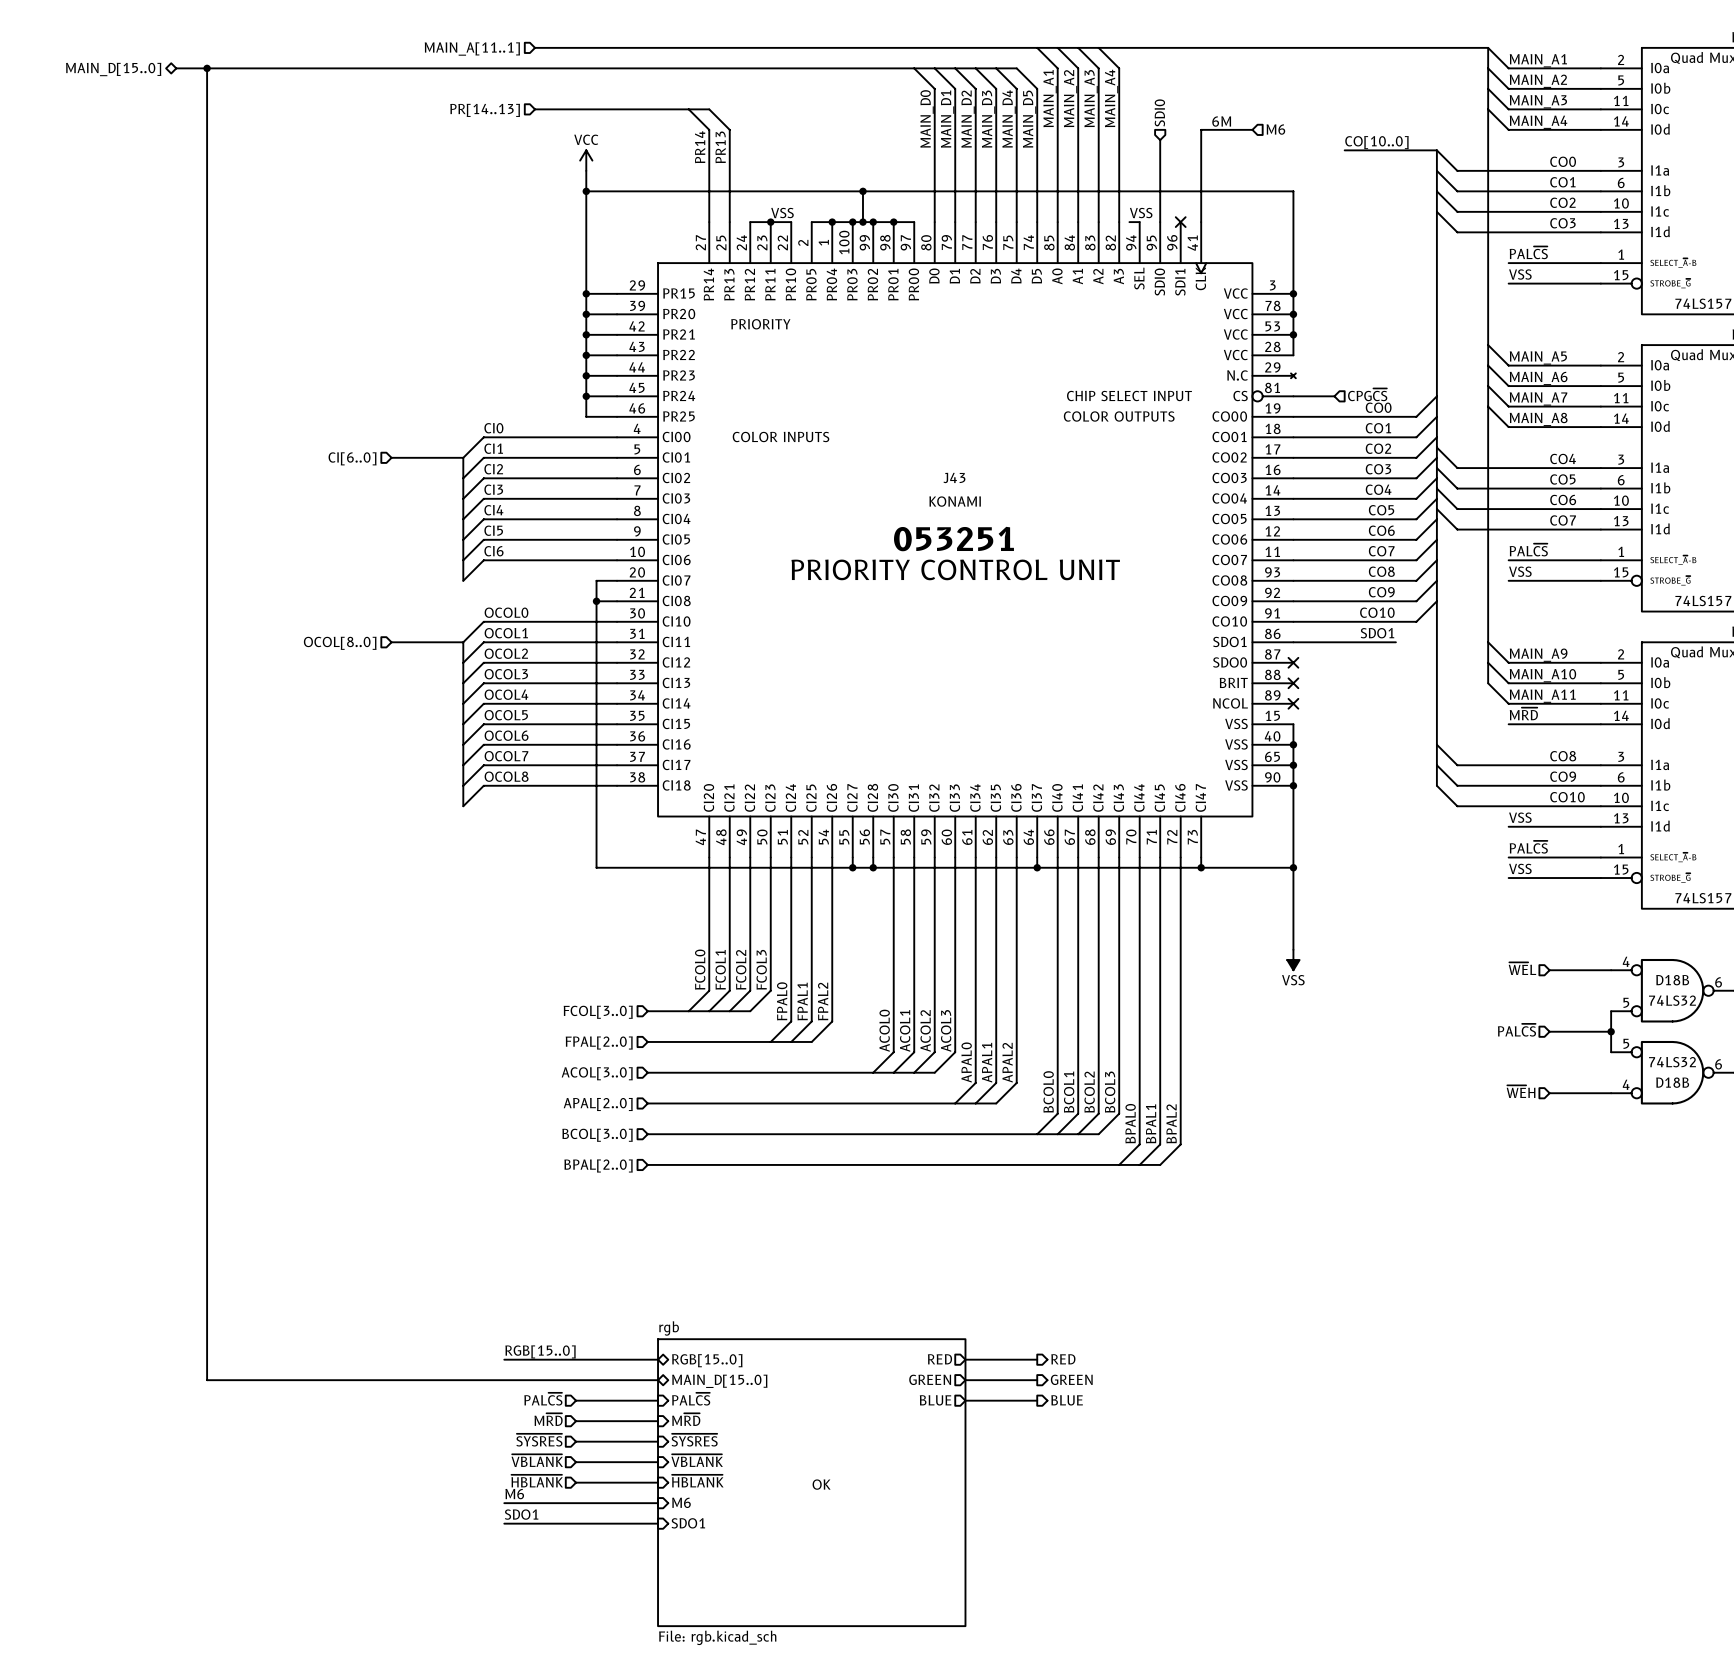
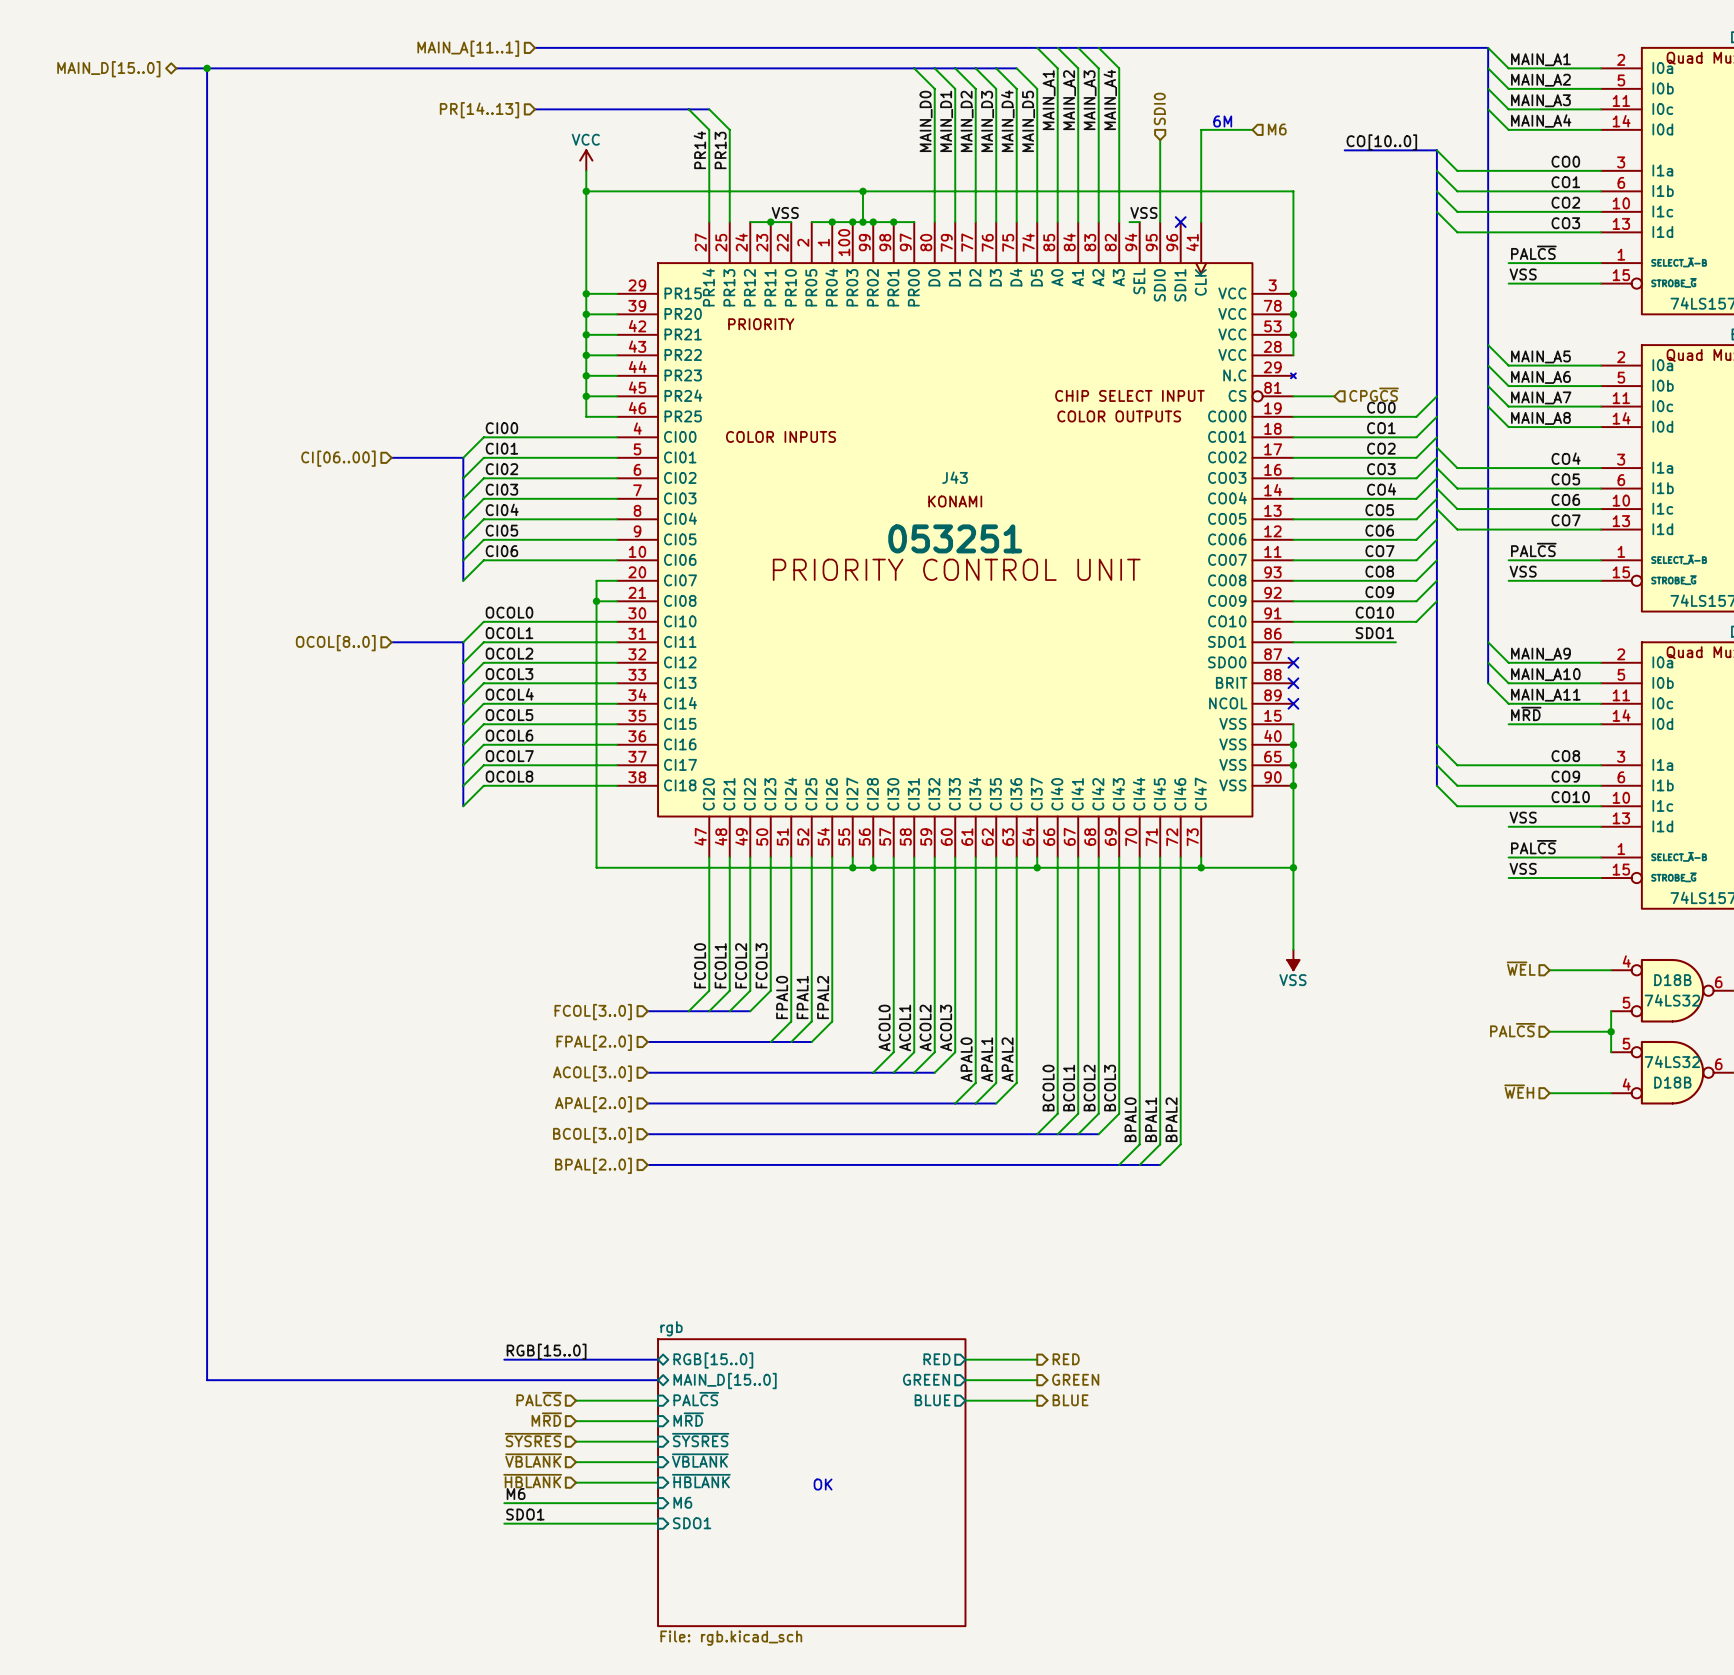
label: CI0 (493, 428) -> CI00 (501, 428)
label: CI1 (493, 448) -> CI01 (501, 448)
hierarchical label: CI[6..0] (352, 458) -> CI[06..00] (338, 458)
label: CI2 (493, 469) -> CI02 (501, 469)
label: CI3 (493, 489) -> CI03 (501, 489)
label: CI4 (493, 510) -> CI04 (502, 509)
label: CI5 (493, 530) -> CI05 (501, 530)
label: CI6 (493, 551) -> CI06 (501, 551)

